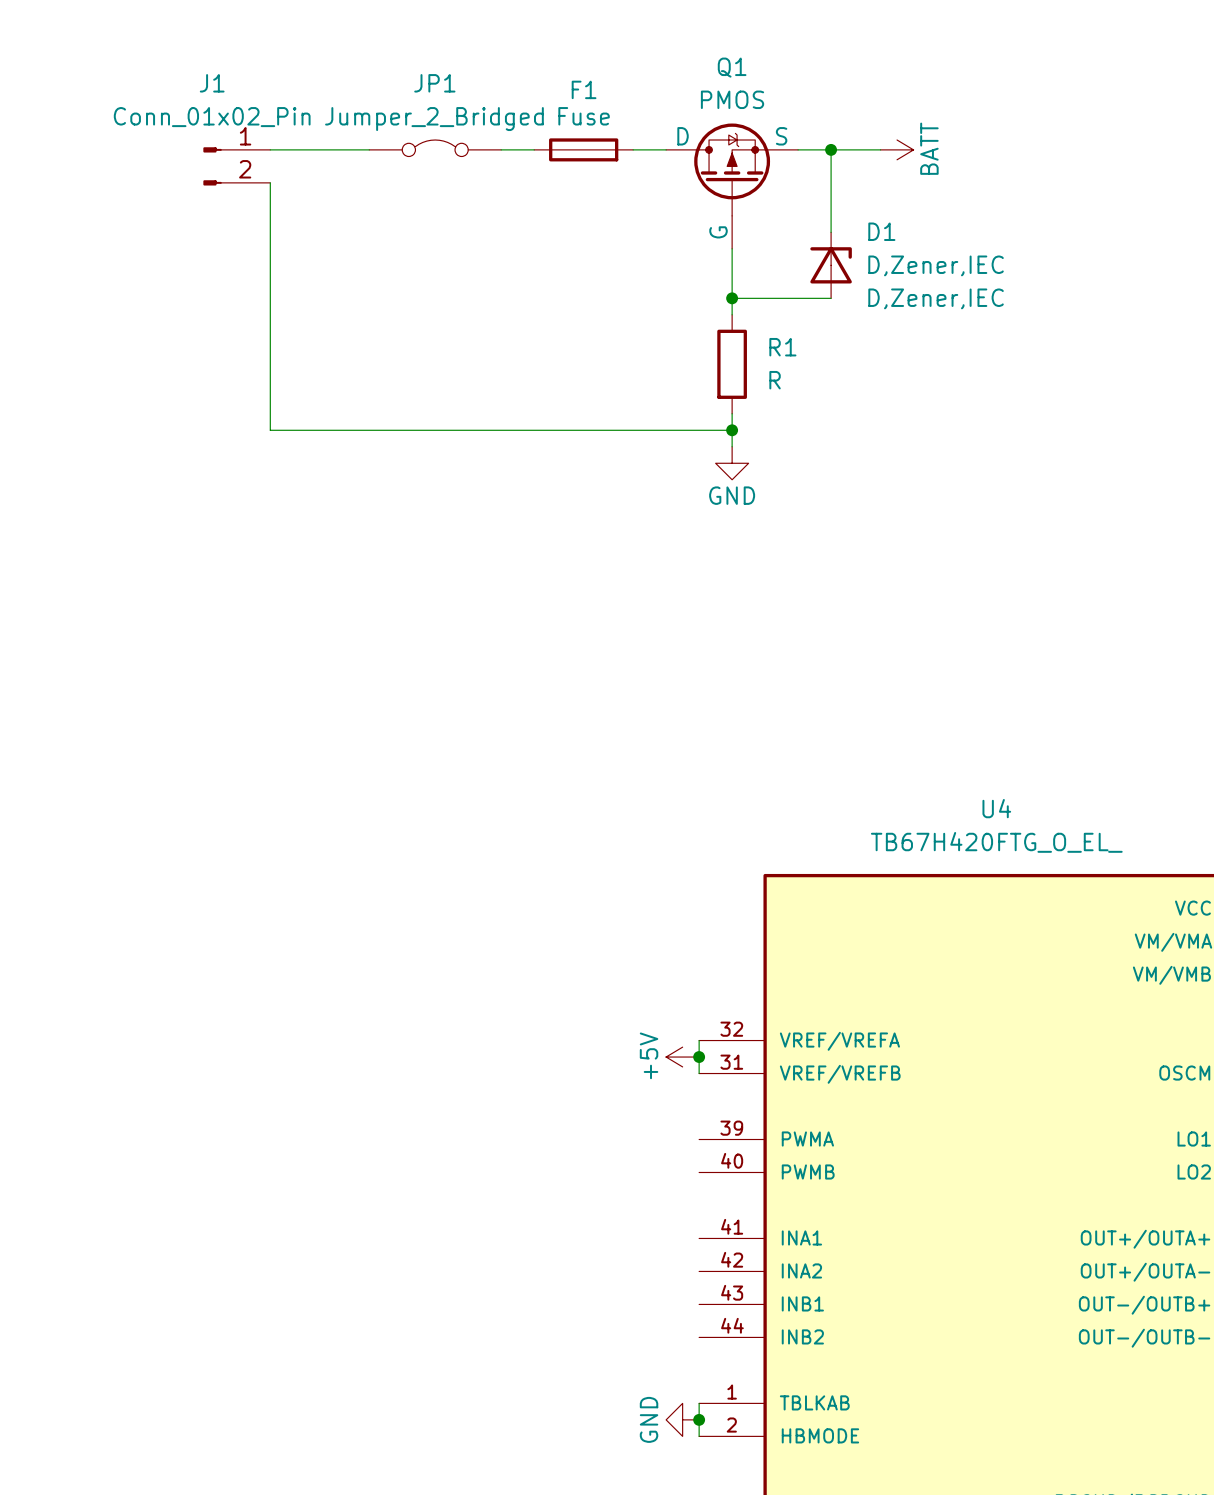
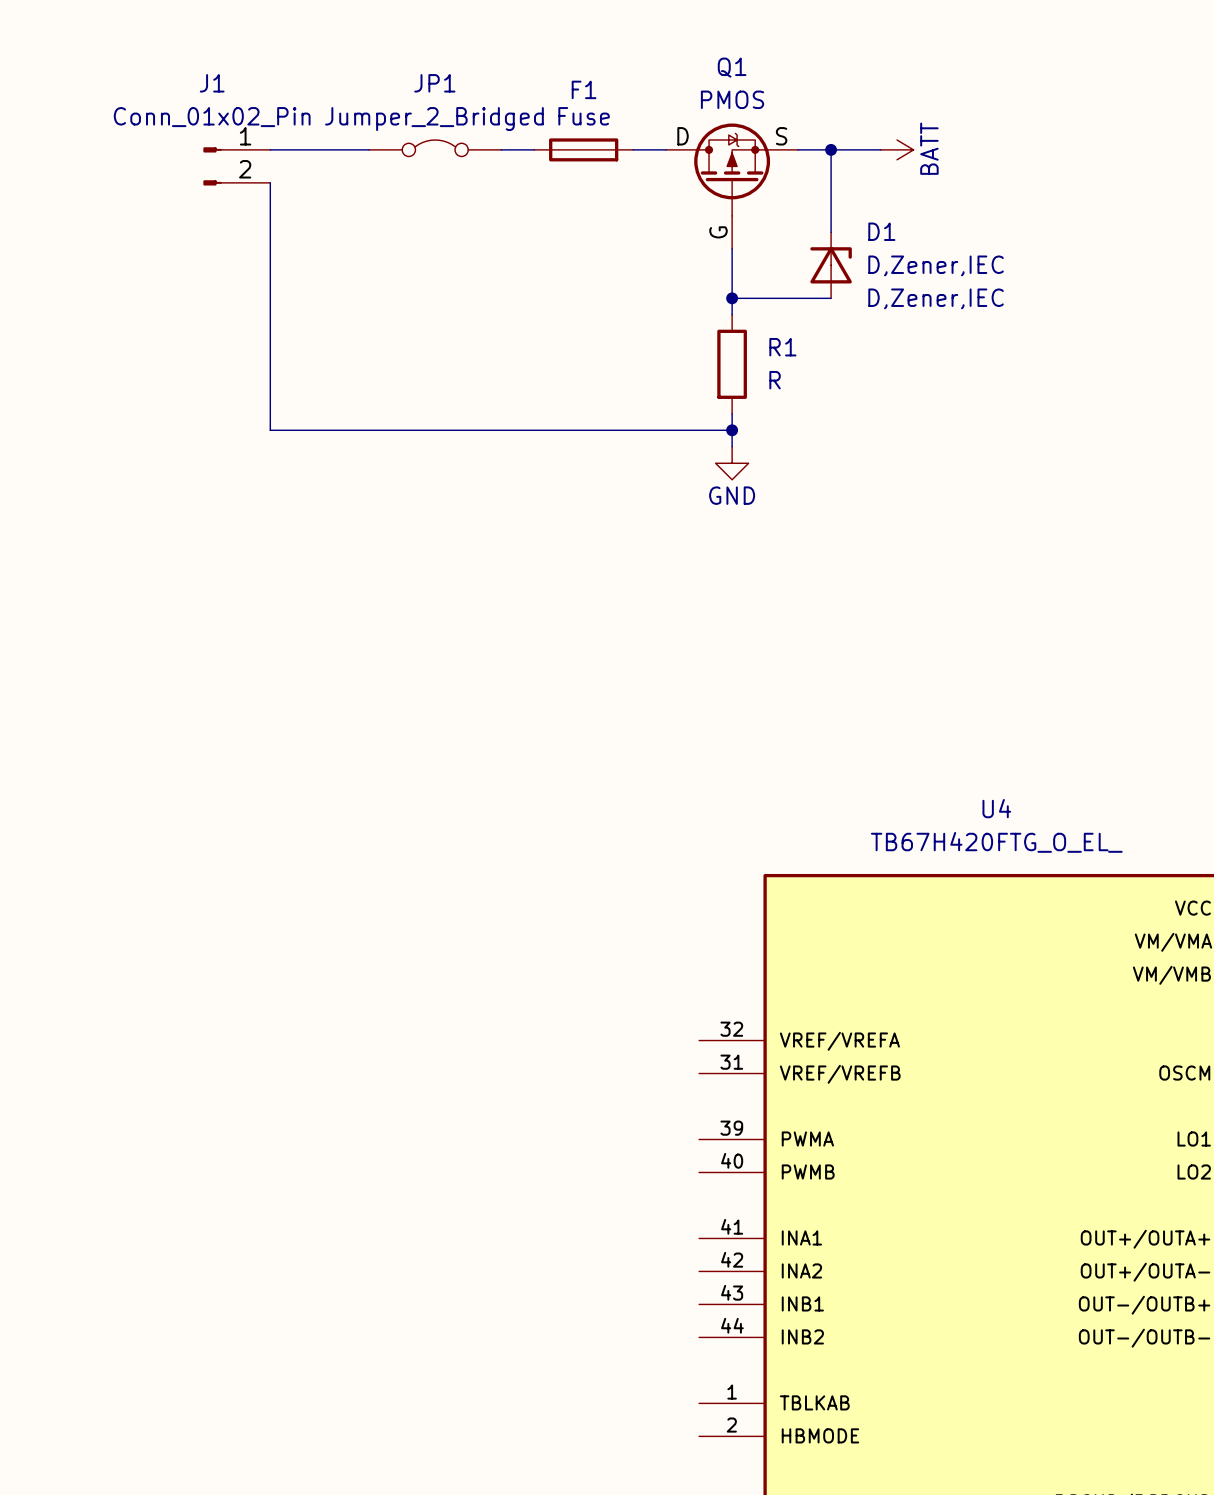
wire: (699, 1040) (699, 1073) -> none
power symbol: +5V (682, 1057) -> none
junction: (699, 1057) -> none
wire: (699, 1403) (699, 1436) -> none
power symbol: GND (682, 1419) -> none
junction: (699, 1419) -> none

